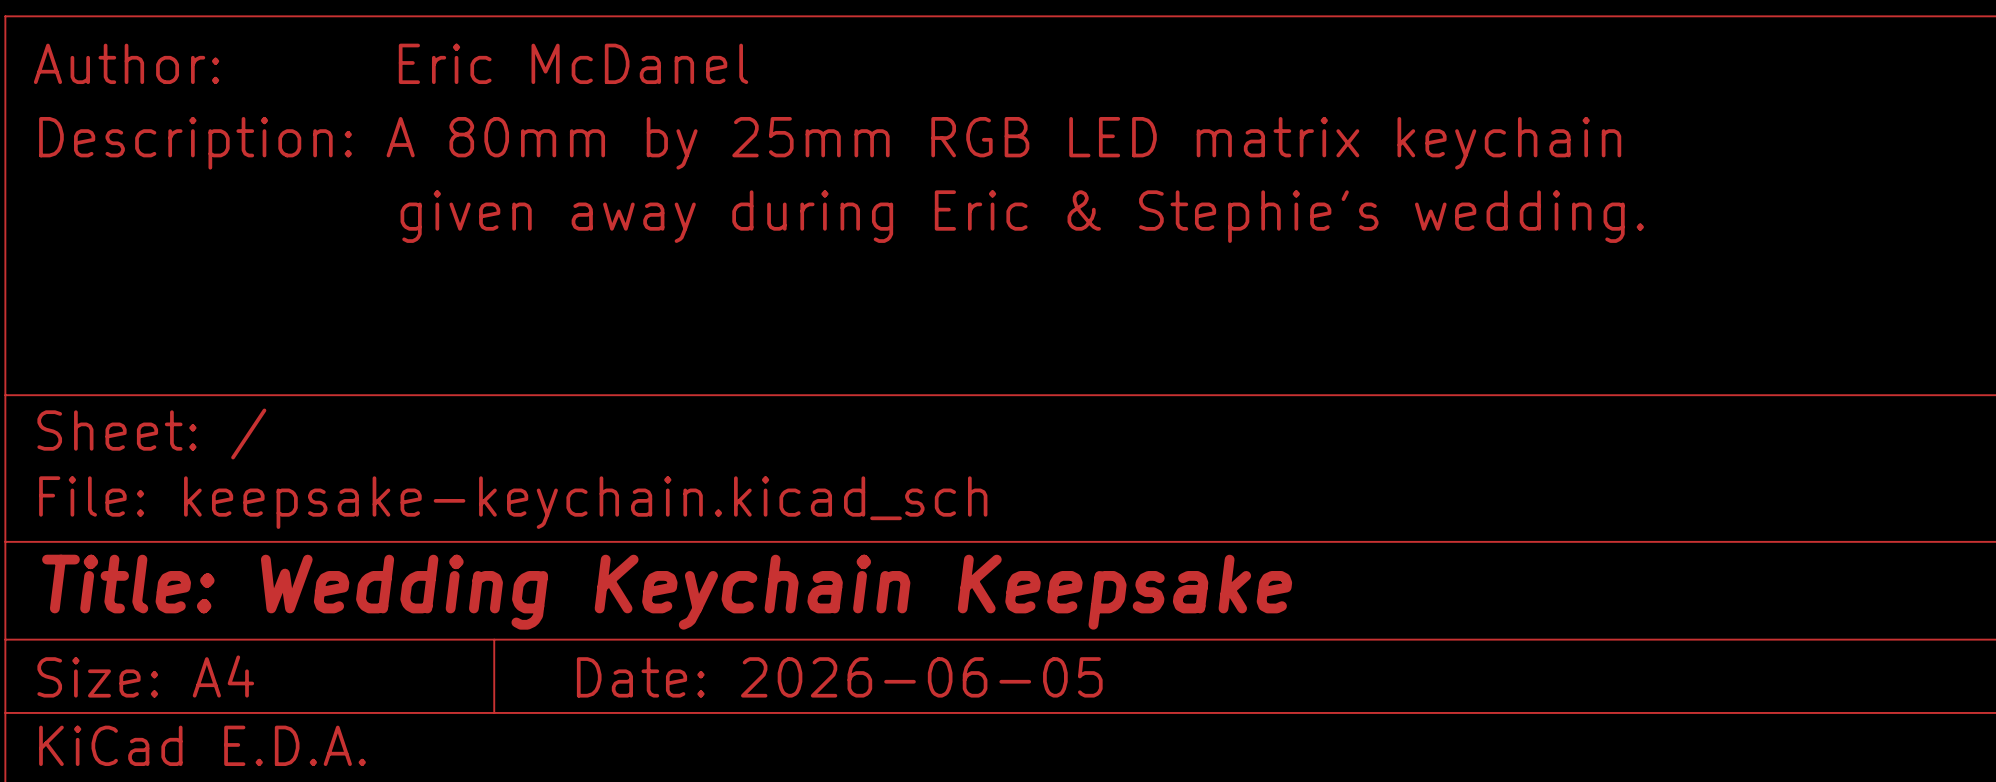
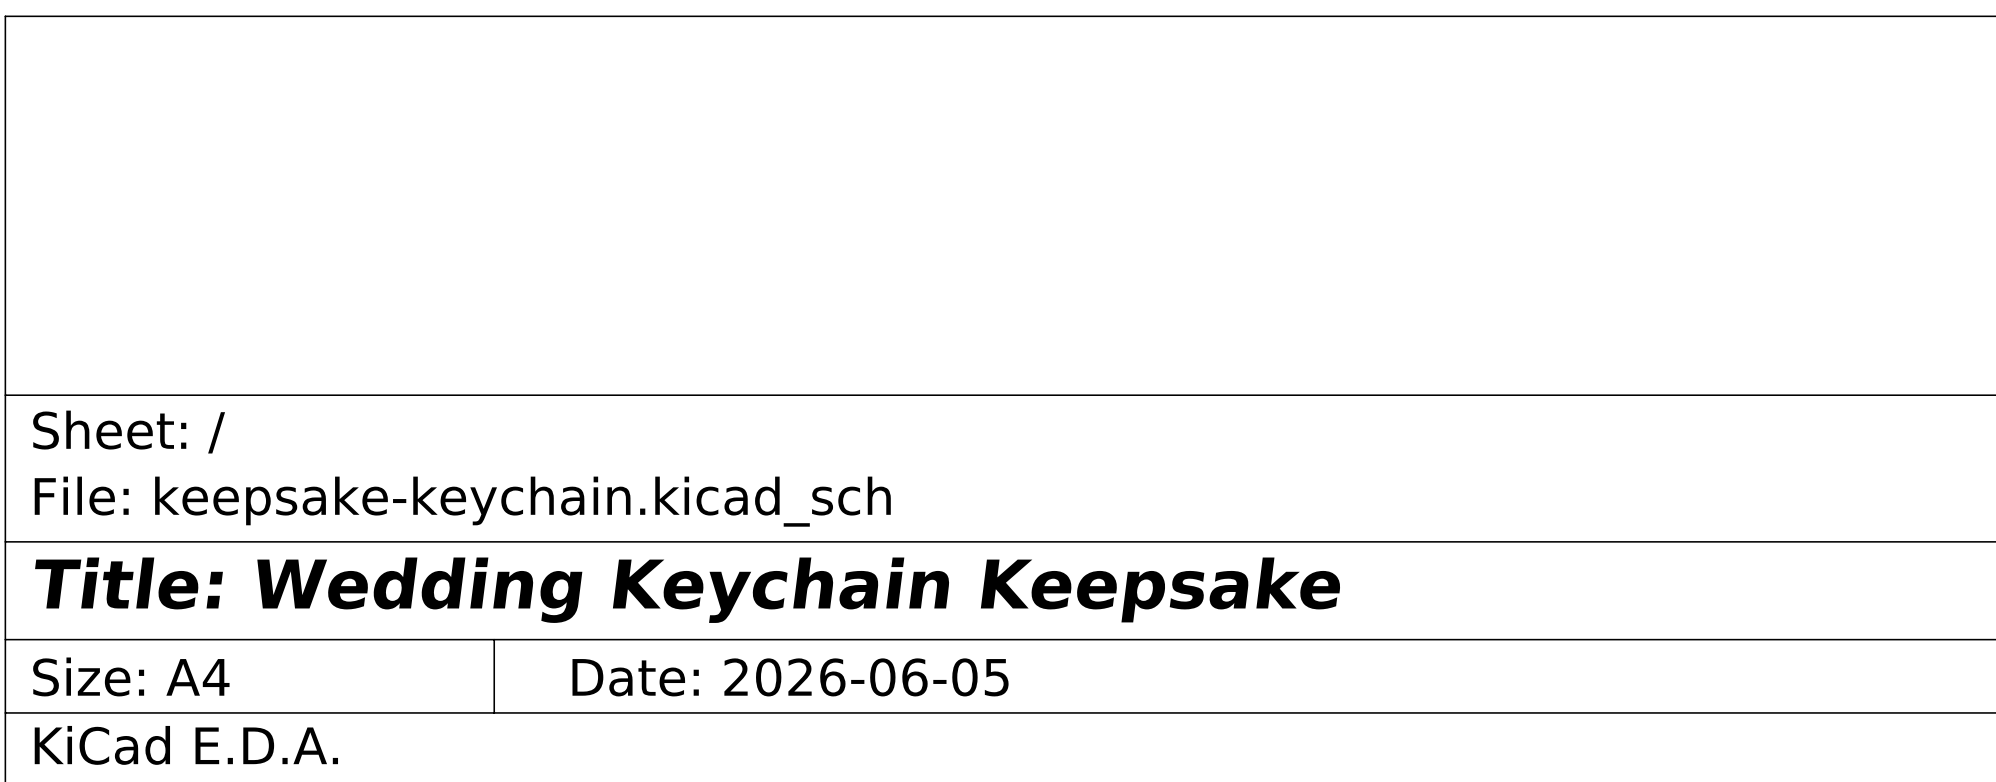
title block: Author: Eric McDanel (391, 63) -> none
title block: Description: A 80mm by 25mm RGB LED matrix keychain (830, 143) -> none
title block: given away during Eric & Stephie's wedding. (1022, 216) -> none

